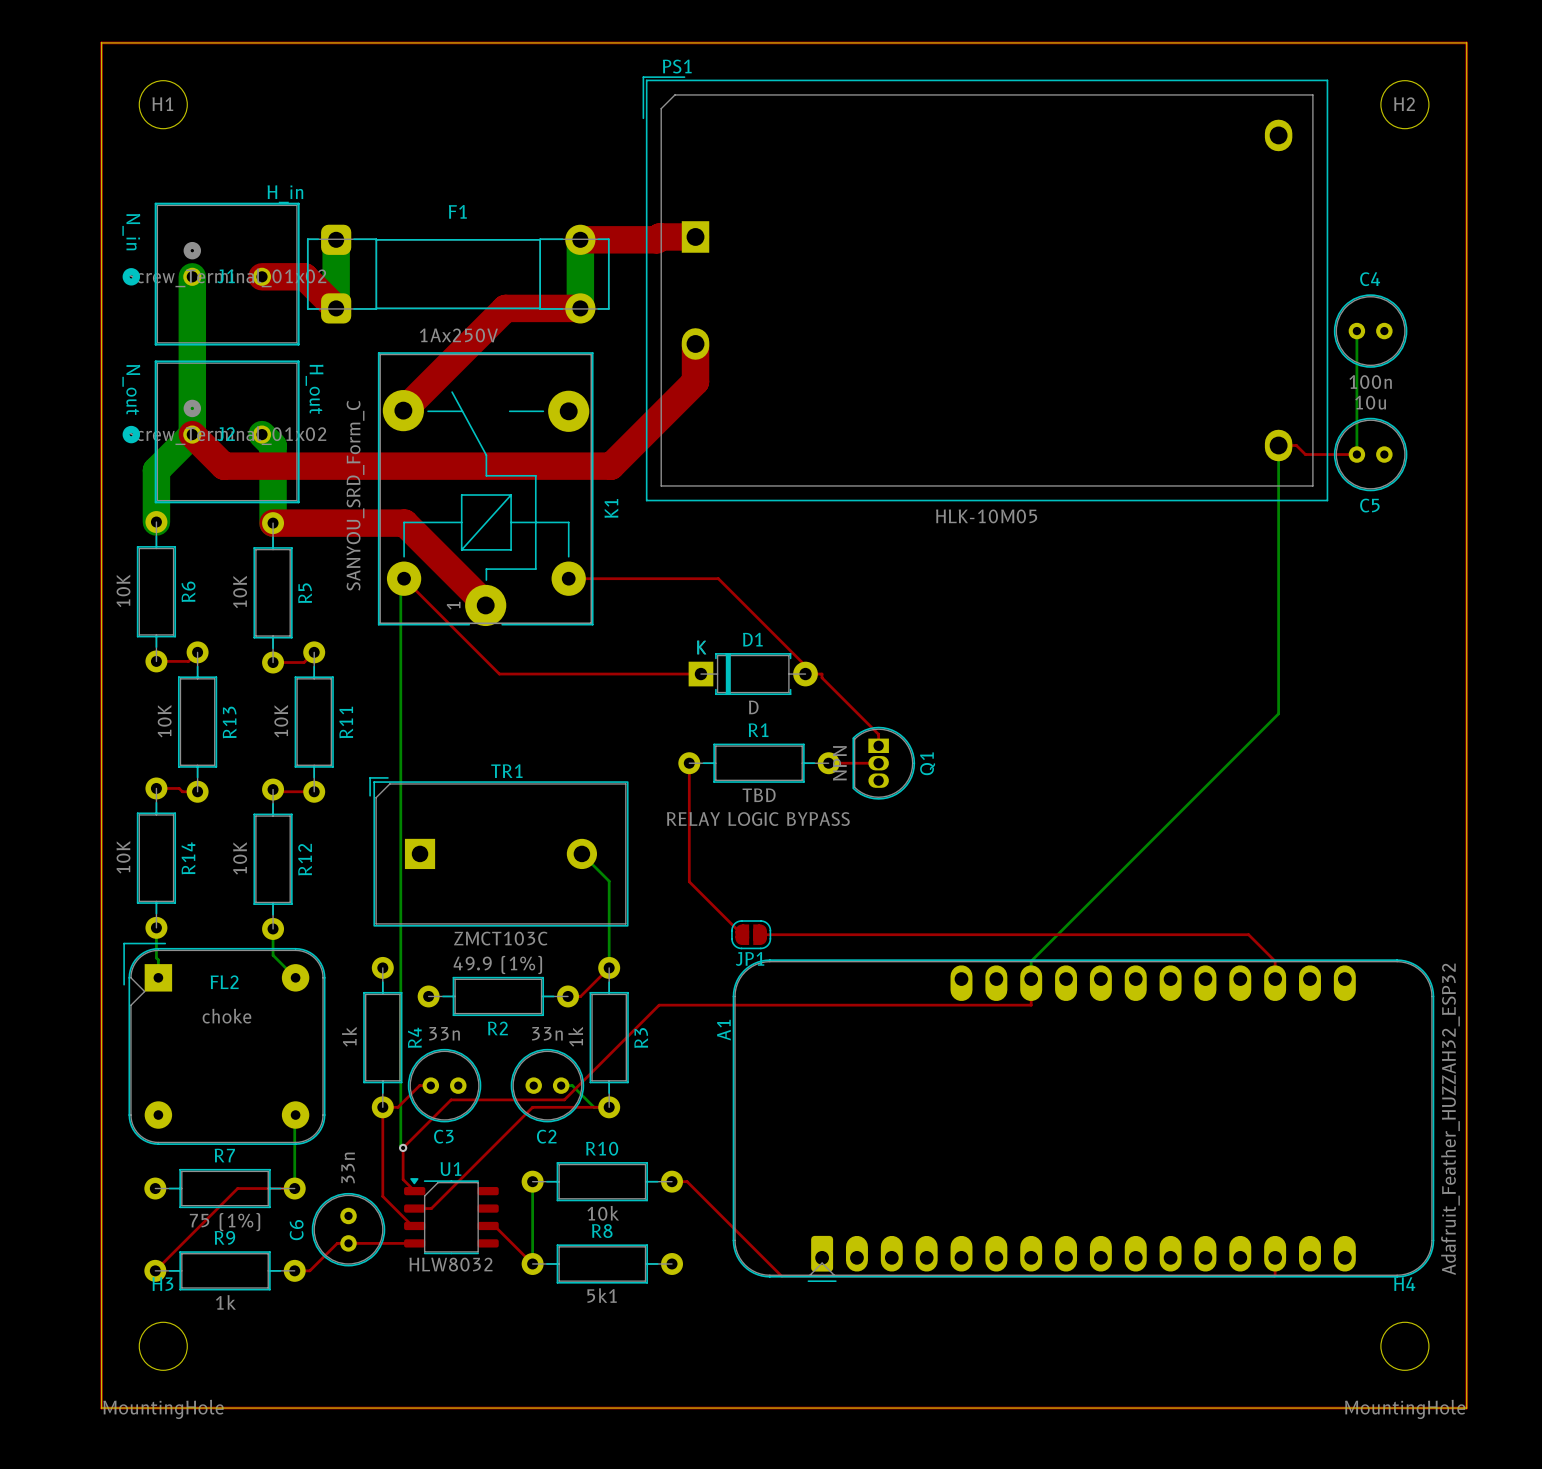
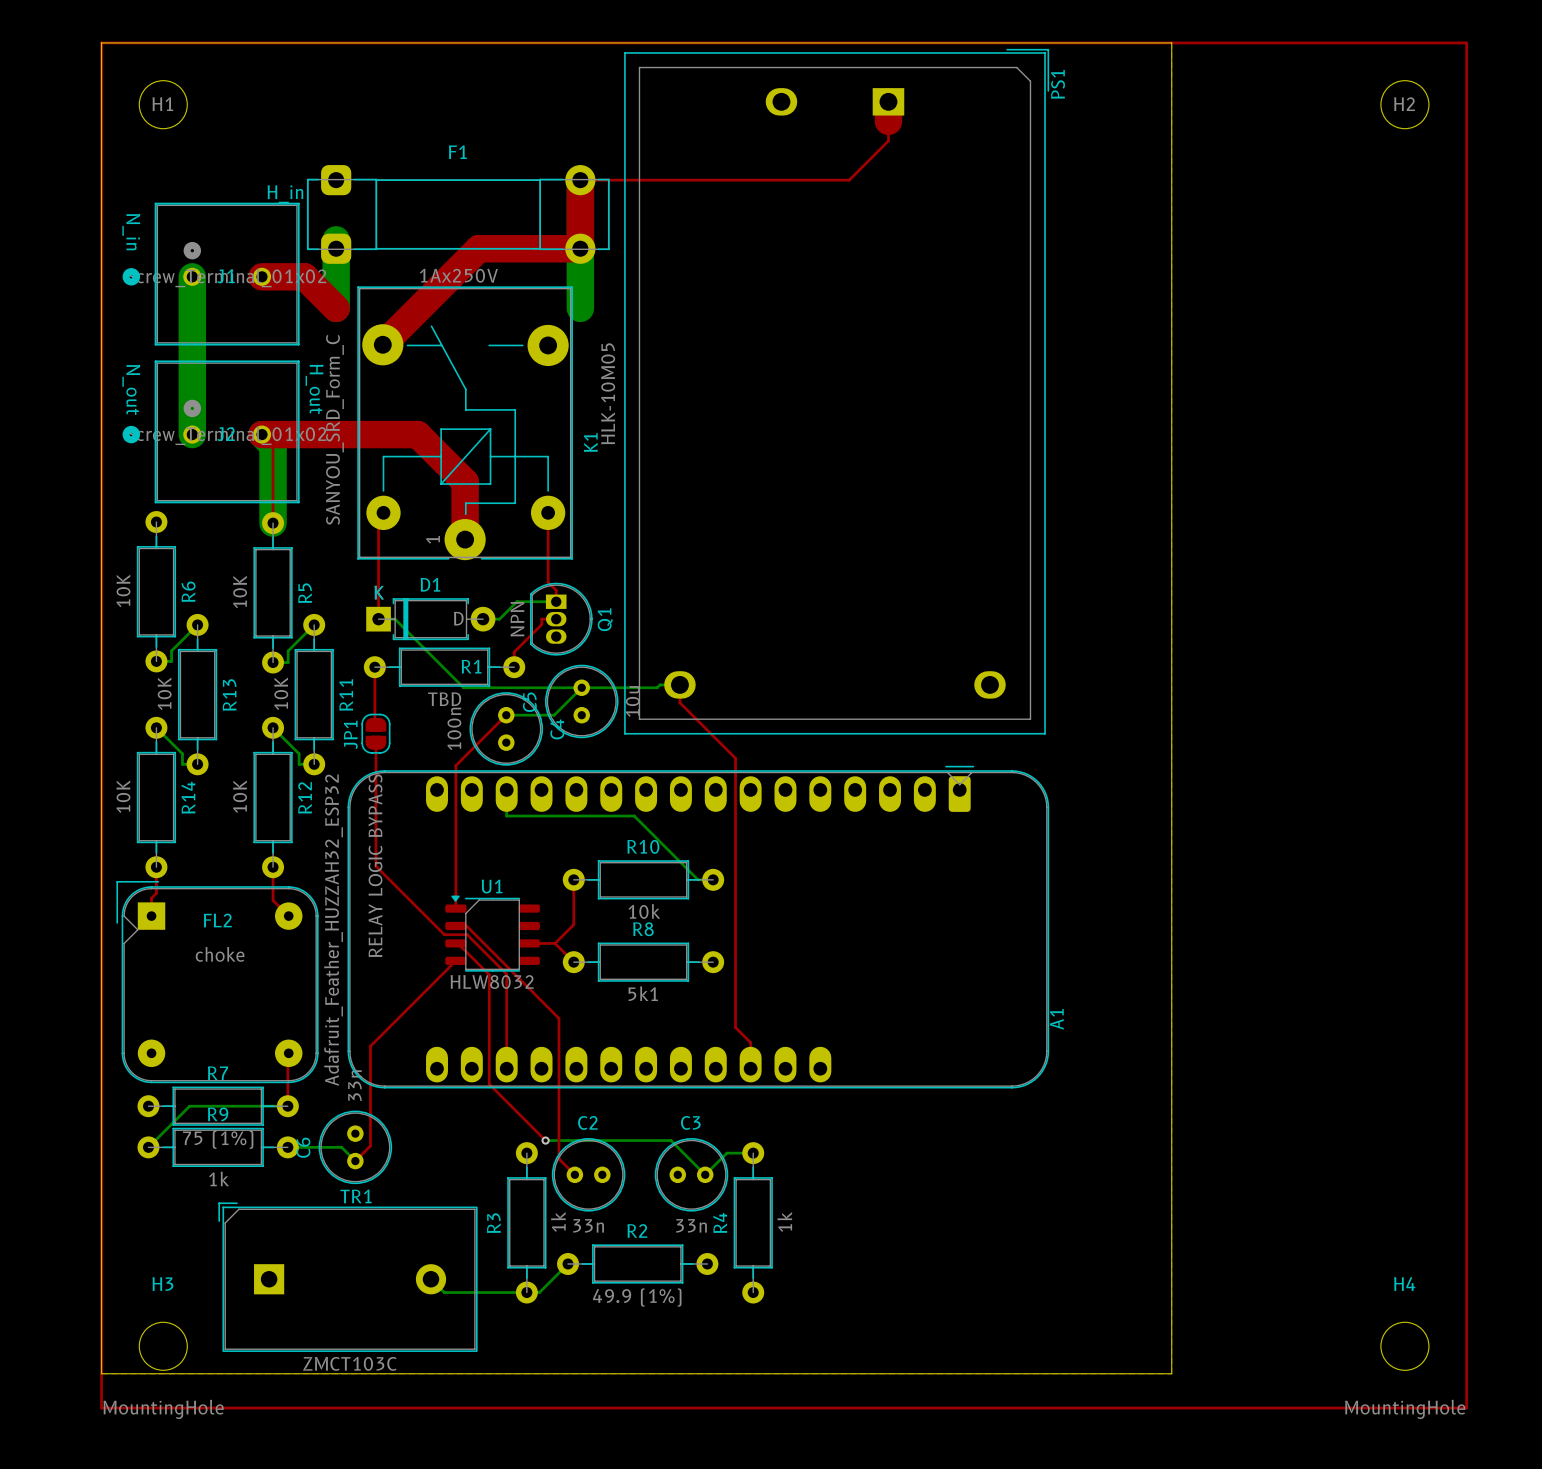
board edge: (1171, 42) (1466, 42) (1466, 1408) (101, 1408) (101, 1373) -> (1171, 42) (1171, 1373) (101, 1373)
top track: none -> (888, 121) (888, 101) (888, 140) (849, 180) (580, 180) (580, 248) (478, 248) (382, 344)
top track: (695, 236) (659, 236) (656, 239) (580, 239) -> none
F1 position: (458, 274) -> (458, 214)
PS1 rotation: 0° (985, 288) -> 90° clockwise (836, 391)
top track: (580, 308) (505, 308) (403, 410) -> none
bottom track: (1356, 331) (1356, 454) -> none
C4 rotation: 0° (1370, 331) -> 90° clockwise (506, 728)
C4 position: (1370, 331) -> (506, 728)
top track: (695, 343) (695, 381) (611, 466) (223, 466) (192, 434) -> none
bottom track: (192, 434) (156, 470) (156, 522) -> none
top track: (1278, 445) (1296, 445) (1305, 454) (1356, 454) -> none
bottom track: (1278, 445) (1278, 713) (1031, 961) (1031, 979) -> none
C5 rotation: 0° (1370, 454) -> 90° clockwise (581, 701)
C5 position: (1370, 454) -> (581, 701)
K1 position: (485, 489) -> (465, 423)
top track: none -> (383, 512) (378, 517) (378, 619)
top track: none -> (548, 512) (548, 582) (556, 590) (556, 601)
top track: (273, 523) (404, 523) (485, 605) -> (273, 523) (273, 445) (262, 434) (417, 434) (465, 481) (465, 539)
top track: (404, 578) (499, 674) (700, 674) -> none
bottom track: (404, 578) (400, 581) (400, 1145) (403, 1147) -> none
top track: (568, 578) (718, 578) (813, 674) -> none
bottom track: none -> (556, 601) (517, 601) (499, 619) (483, 619)
bottom track: none -> (378, 619) (395, 619) (463, 687) (657, 687) (660, 684) (679, 684)
top track: none -> (556, 619) (541, 619) (541, 624) (514, 652) (514, 667)
bottom track: none -> (197, 624) (171, 650) (171, 661) (156, 661)
bottom track: none -> (314, 624) (288, 650) (288, 662) (273, 662)
top track: (197, 652) (188, 661) (156, 661) -> none
top track: (314, 652) (304, 662) (273, 662) -> none
top track: none -> (374, 667) (375, 724)
D1 position: (753, 674) -> (430, 619)
top track: (805, 674) (822, 674) (822, 677) (878, 734) (878, 745) -> none
top track: none -> (679, 684) (679, 702) (735, 758) (735, 1027) (750, 1042) (750, 1068)
bottom track: none -> (581, 687) (554, 715) (506, 715)
D1 value position: D (753, 707) -> D (458, 618)
top track: none -> (506, 715) (455, 765) (455, 908)
R13 position: (197, 722) -> (197, 694)
R11 position: (314, 722) -> (314, 694)
bottom track: none -> (156, 727) (182, 753) (182, 764) (197, 764)
bottom track: none -> (273, 727) (299, 753) (299, 764) (314, 764)
R1 name position: R1 (758, 730) -> R1 (471, 666)
top track: none -> (375, 742) (375, 866) (444, 934) (467, 934) (506, 974) (506, 1068)
top track: (689, 763) (689, 881) (742, 934) -> none
R1 position: (759, 763) -> (444, 667)
top track: (828, 763) (878, 763) -> none
Q1 position: (883, 763) -> (561, 619)
top track: (156, 788) (179, 788) (182, 791) (197, 791) -> none
top track: (273, 789) (275, 791) (314, 791) -> none
bottom track: none -> (506, 789) (506, 816) (634, 816) (698, 879) (713, 879)
JP1 value position: RELAY LOGIC BYPASS (758, 819) -> RELAY LOGIC BYPASS (375, 865)
TR1 position: (498, 851) -> (347, 1277)
bottom track: (581, 853) (609, 881) (609, 967) -> none
R14 position: (156, 858) -> (156, 797)
R12 position: (273, 859) -> (273, 797)
top track: none -> (156, 867) (156, 893) (151, 898) (151, 916)
top track: none -> (273, 867) (273, 900) (288, 916)
top track: none -> (573, 879) (573, 924) (555, 943)
top track: none -> (455, 926) (466, 926) (558, 1018) (558, 1158) (574, 1174)
bottom track: (156, 927) (158, 977) -> none
bottom track: (273, 928) (273, 955) (295, 977) -> none
JP1 rotation: 0° (751, 934) -> 90° clockwise (375, 733)
JP1 position: (751, 934) -> (375, 733)
top track: (760, 934) (1248, 934) (1275, 961) (1275, 979) -> none
top track: none -> (455, 943) (489, 974) (489, 1084) (545, 1140)
top track: none -> (529, 943) (555, 943)
top track: none -> (555, 943) (573, 962)
top track: none -> (455, 960) (370, 1046) (370, 1146) (355, 1161)
R2 value position: 49.9 (1%) (497, 964) -> 49.9 (1%) (637, 1297)
top track: (609, 967) (580, 996) (568, 996) -> none
top track: (1031, 979) (1031, 1005) (659, 1005) (564, 1099) (451, 1099) (403, 1147) (403, 1179) (414, 1191) -> none
R2 position: (498, 996) -> (637, 1263)
R2 name position: R2 (497, 1028) -> R2 (637, 1230)
C3 value position: 33n (444, 1033) -> 33n (691, 1225)
C2 value position: 33n (547, 1033) -> 33n (588, 1225)
R4 value position: 1k (349, 1036) -> 1k (784, 1221)
R3 value position: 1k (575, 1036) -> 1k (558, 1221)
R4 position: (382, 1037) -> (753, 1222)
R4 name position: R4 (414, 1037) -> R4 (720, 1223)
R3 position: (609, 1037) -> (526, 1222)
R3 name position: R3 (641, 1038) -> R3 (493, 1223)
FL2 position: (224, 1043) -> (217, 982)
top track: none -> (288, 1053) (287, 1106)
top track: (430, 1085) (419, 1085) (397, 1107) (382, 1107) (382, 1196) (412, 1225) (414, 1225) -> none
C3 position: (444, 1085) -> (691, 1174)
C2 position: (547, 1085) -> (588, 1174)
bottom track: (561, 1085) (572, 1085) (594, 1107) (609, 1107) -> none
bottom track: none -> (287, 1106) (189, 1106) (148, 1147)
top track: (609, 1107) (532, 1107) (431, 1208) (414, 1208) -> none
bottom track: (295, 1115) (294, 1188) -> none
A1 rotation: 0° (1083, 1120) -> 180° (698, 927)
A1 position: (1083, 1120) -> (698, 927)
C3 name position: C3 (443, 1136) -> C3 (690, 1122)
C2 name position: C2 (546, 1136) -> C2 (587, 1122)
bottom track: none -> (545, 1140) (670, 1140) (705, 1174) (726, 1153) (753, 1153)
via: none -> (545, 1140)
bottom track: none -> (287, 1147) (341, 1147) (355, 1161)
via: (403, 1147) -> none
bottom track: (532, 1181) (532, 1263) -> none
R10 position: (602, 1181) -> (643, 879)
top track: (672, 1181) (687, 1181) (781, 1276) (1274, 1276) (1275, 1257) -> none
R7 position: (225, 1188) -> (218, 1106)
top track: (294, 1188) (237, 1188) (155, 1270) -> none
U1 position: (451, 1216) -> (492, 933)
top track: (488, 1225) (494, 1225) (532, 1263) -> none
C6 position: (348, 1229) -> (355, 1147)
top track: (414, 1243) (337, 1243) (309, 1270) (294, 1270) -> none
bottom track: none -> (568, 1263) (539, 1292) (444, 1292) (431, 1279)
R8 position: (602, 1263) -> (643, 962)
R9 position: (225, 1270) -> (218, 1147)

